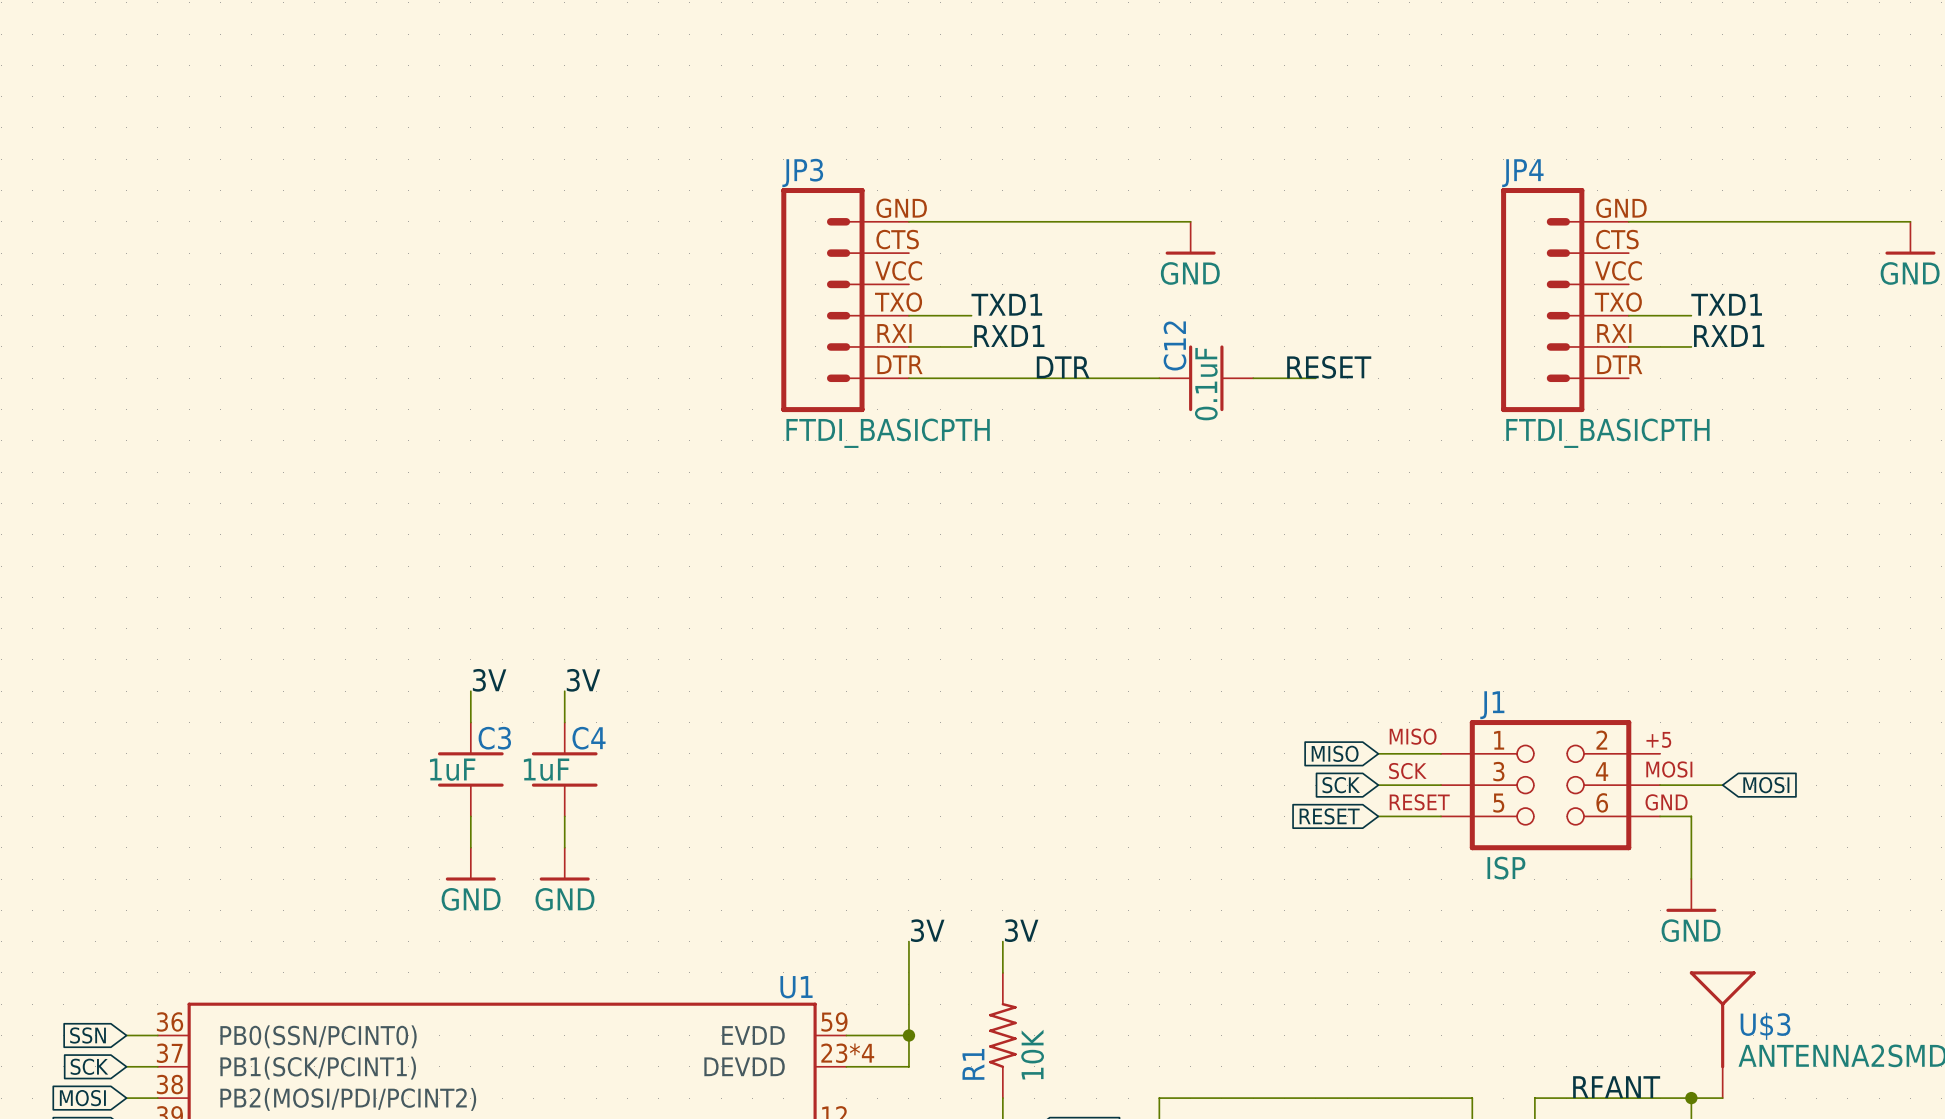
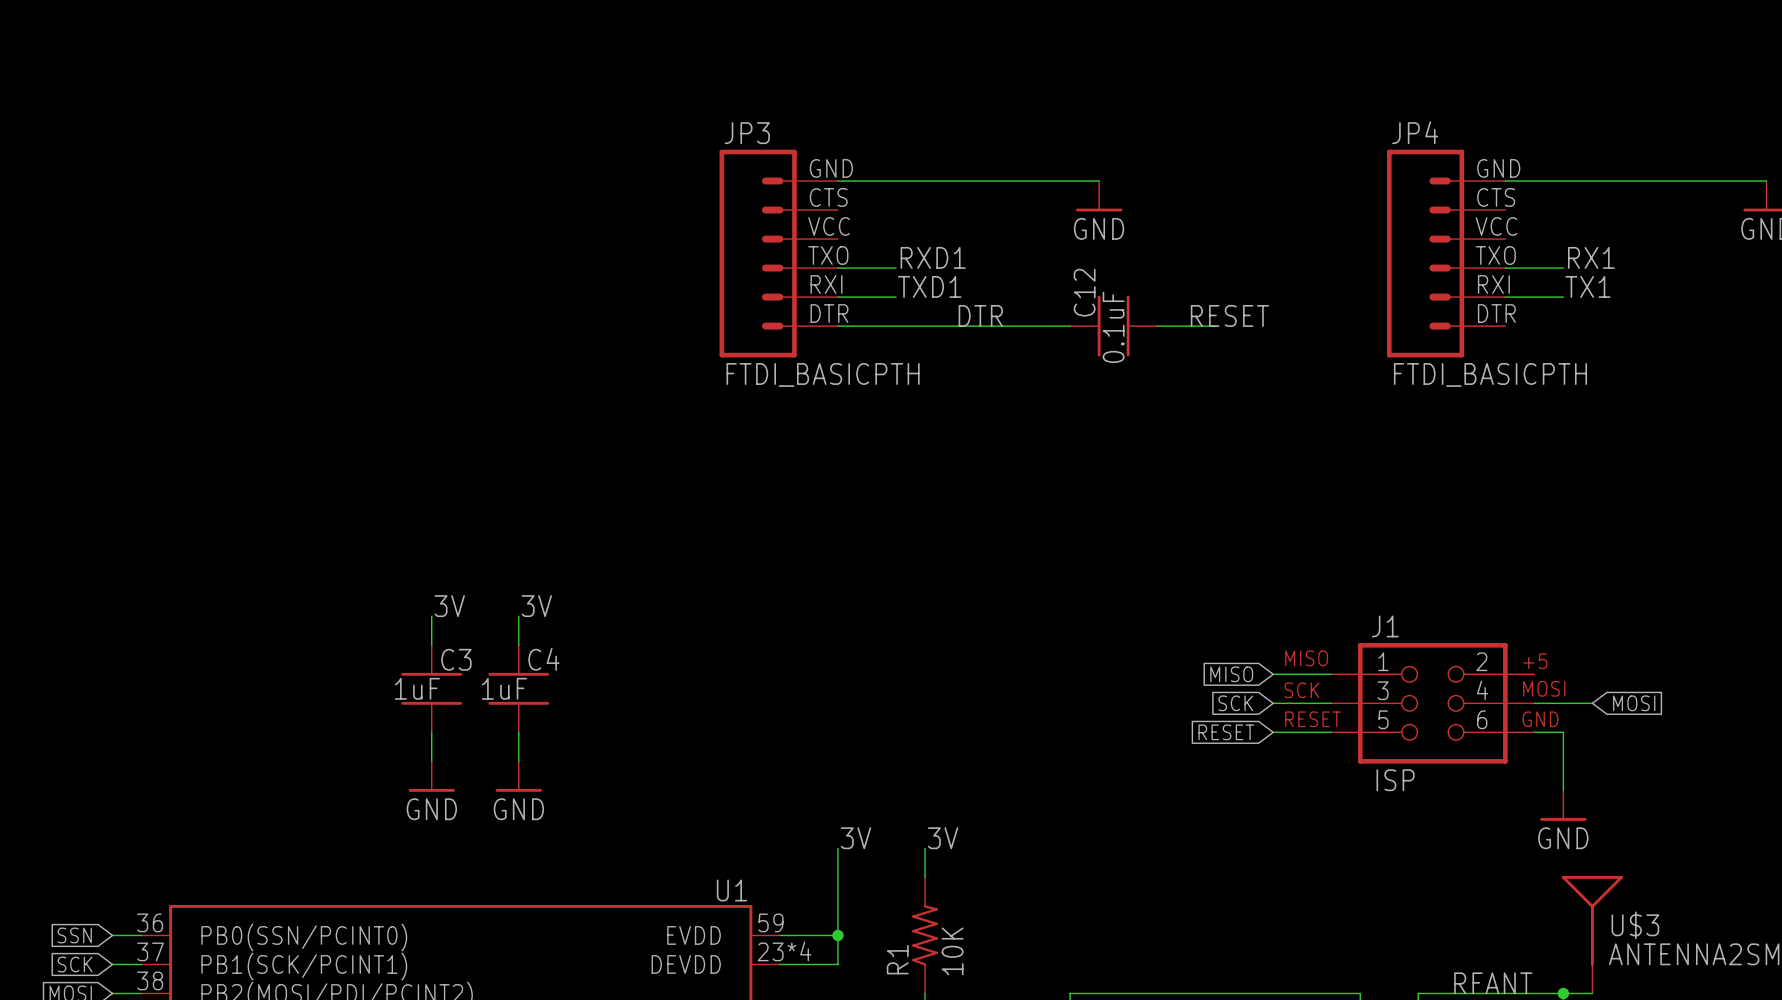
label: TXD1 (1006, 304) -> RXD1 (933, 257)
label: TXD1 (1726, 304) -> RX1 (1591, 257)
label: RXD1 (1009, 336) -> TXD1 (929, 286)
label: RXD1 (1729, 336) -> TX1 (1587, 286)

